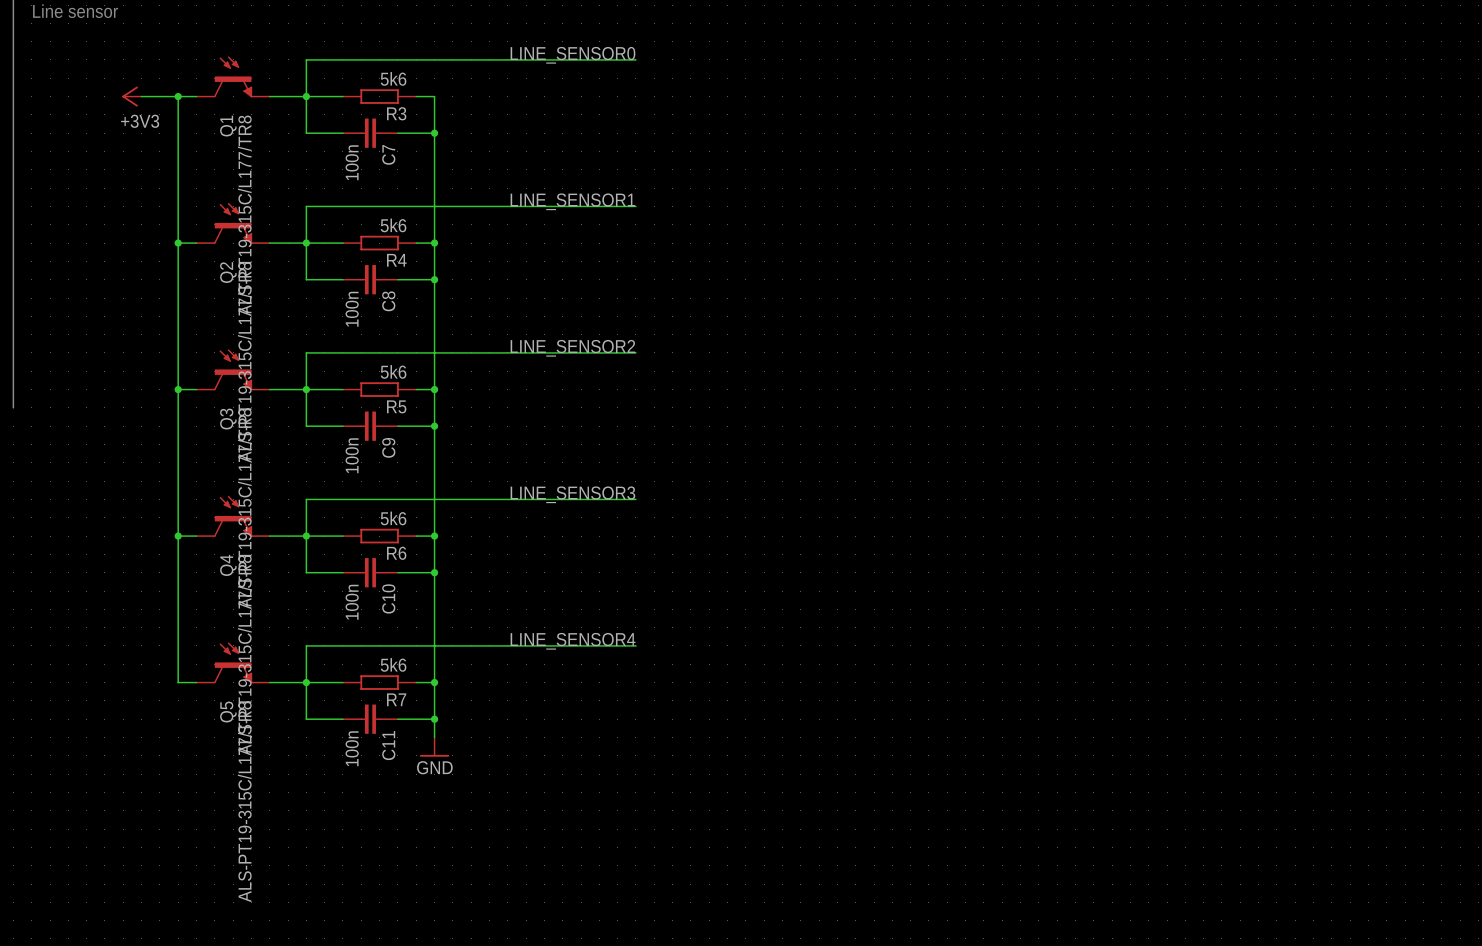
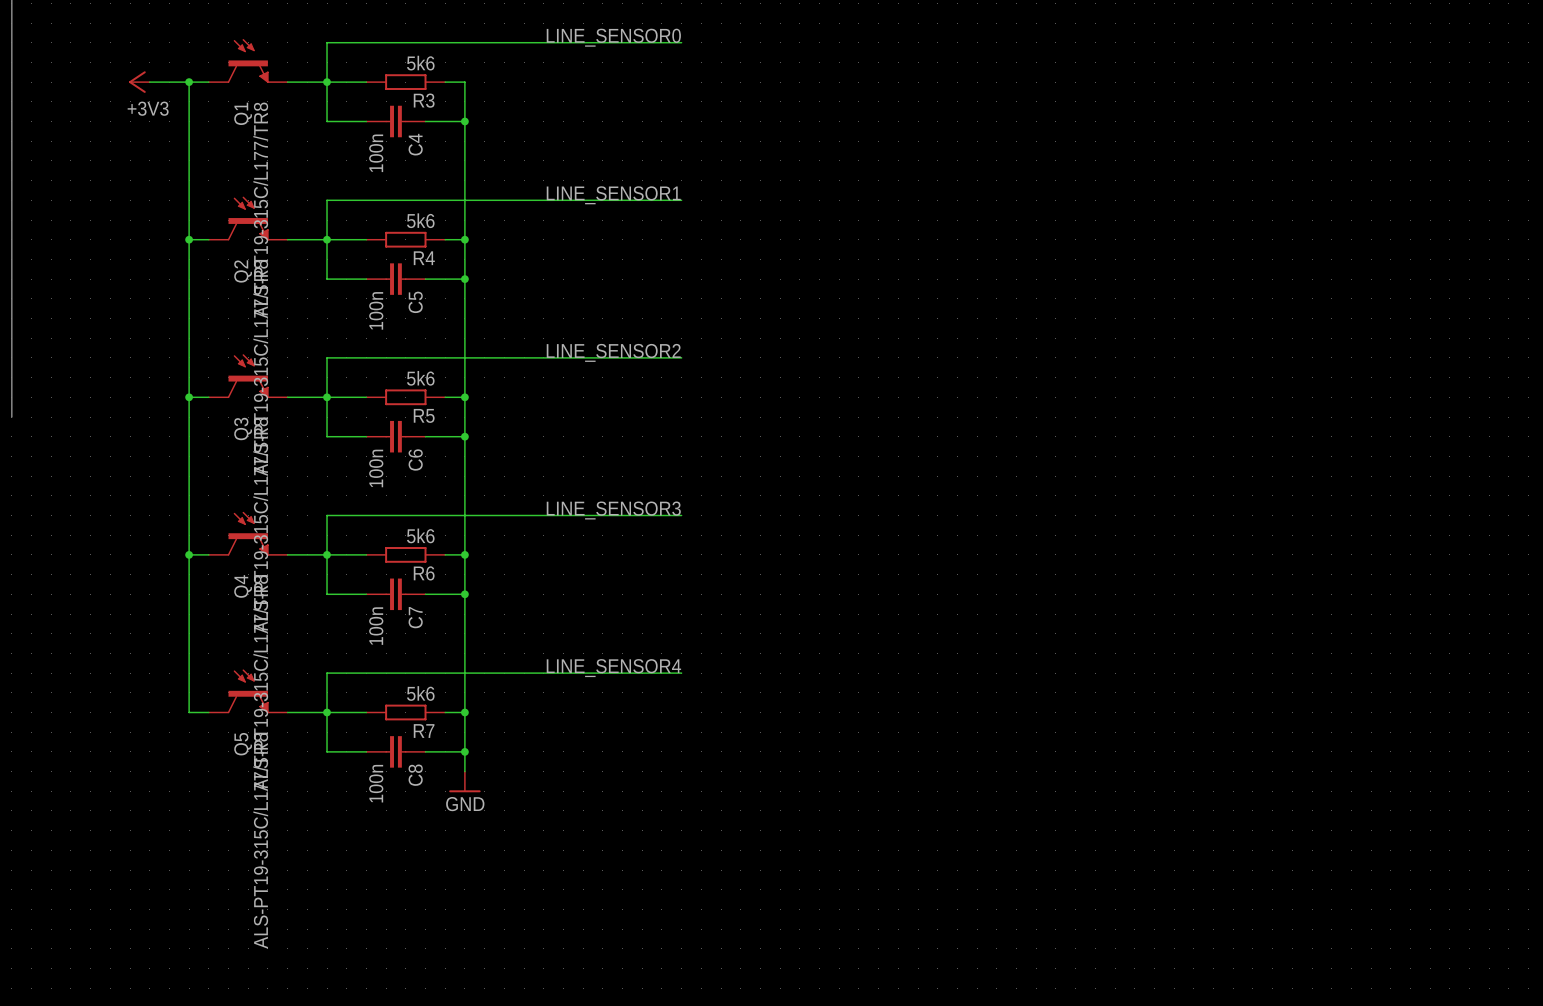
C7 name: C7 (388, 154) -> C4 (415, 144)
C8 name: C8 (388, 301) -> C5 (415, 302)
C9 name: C9 (388, 447) -> C6 (415, 459)
C10 name: C10 (388, 598) -> C7 (415, 617)
C11 name: C11 (388, 745) -> C8 (415, 775)

